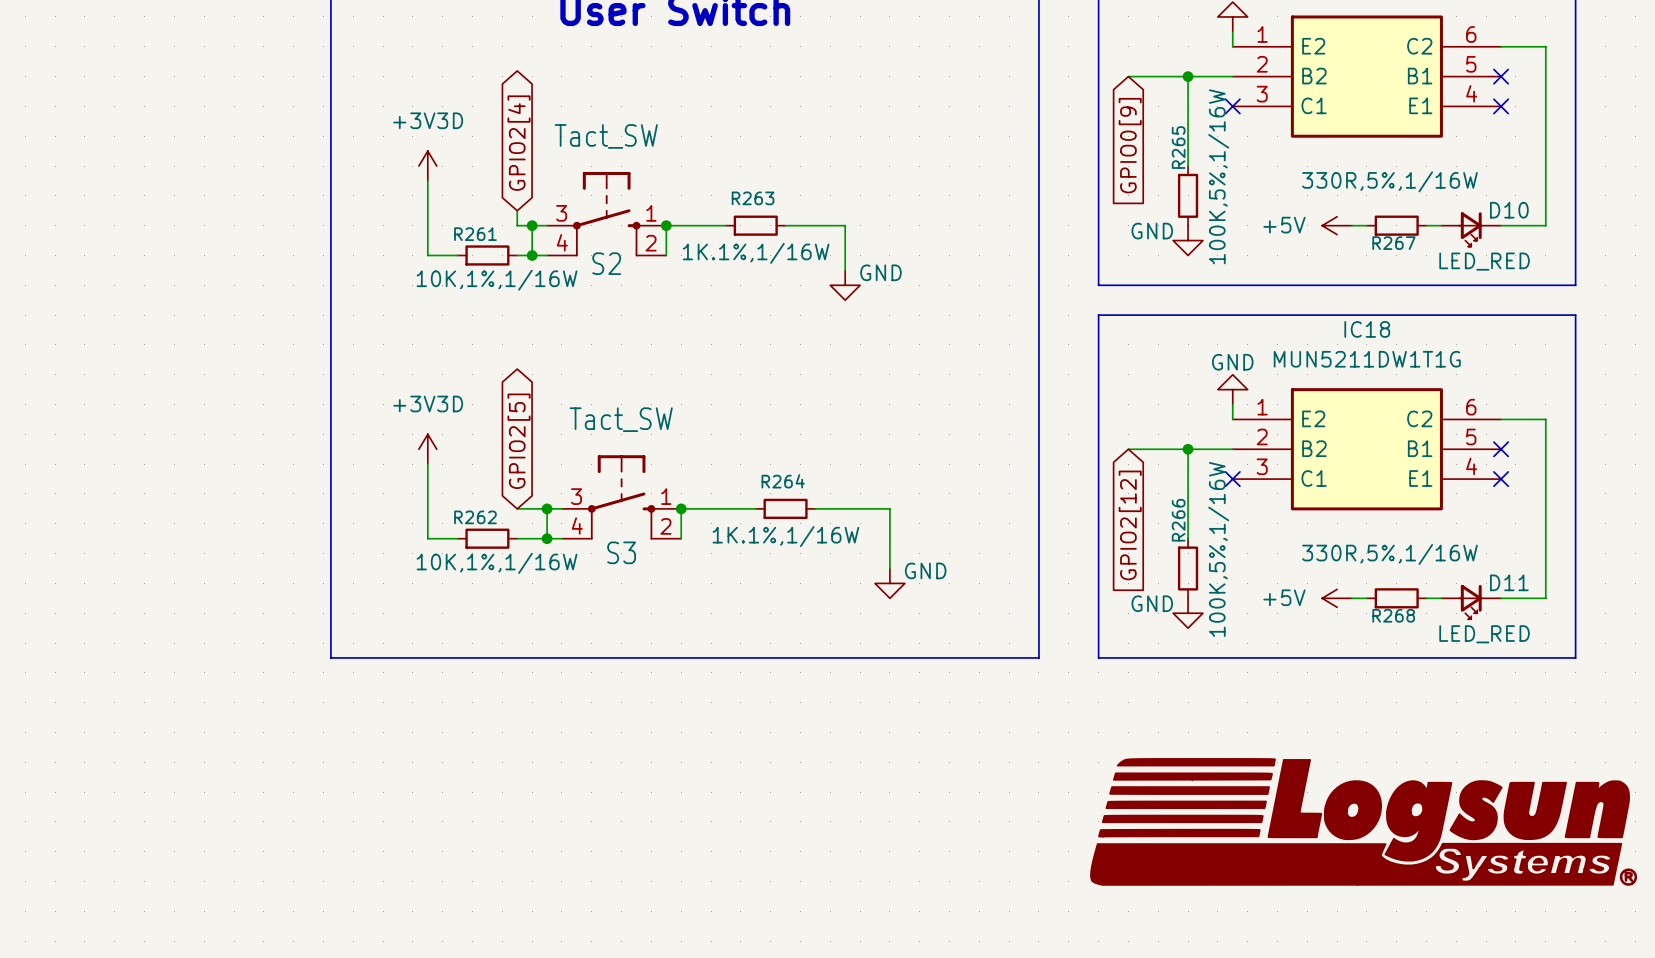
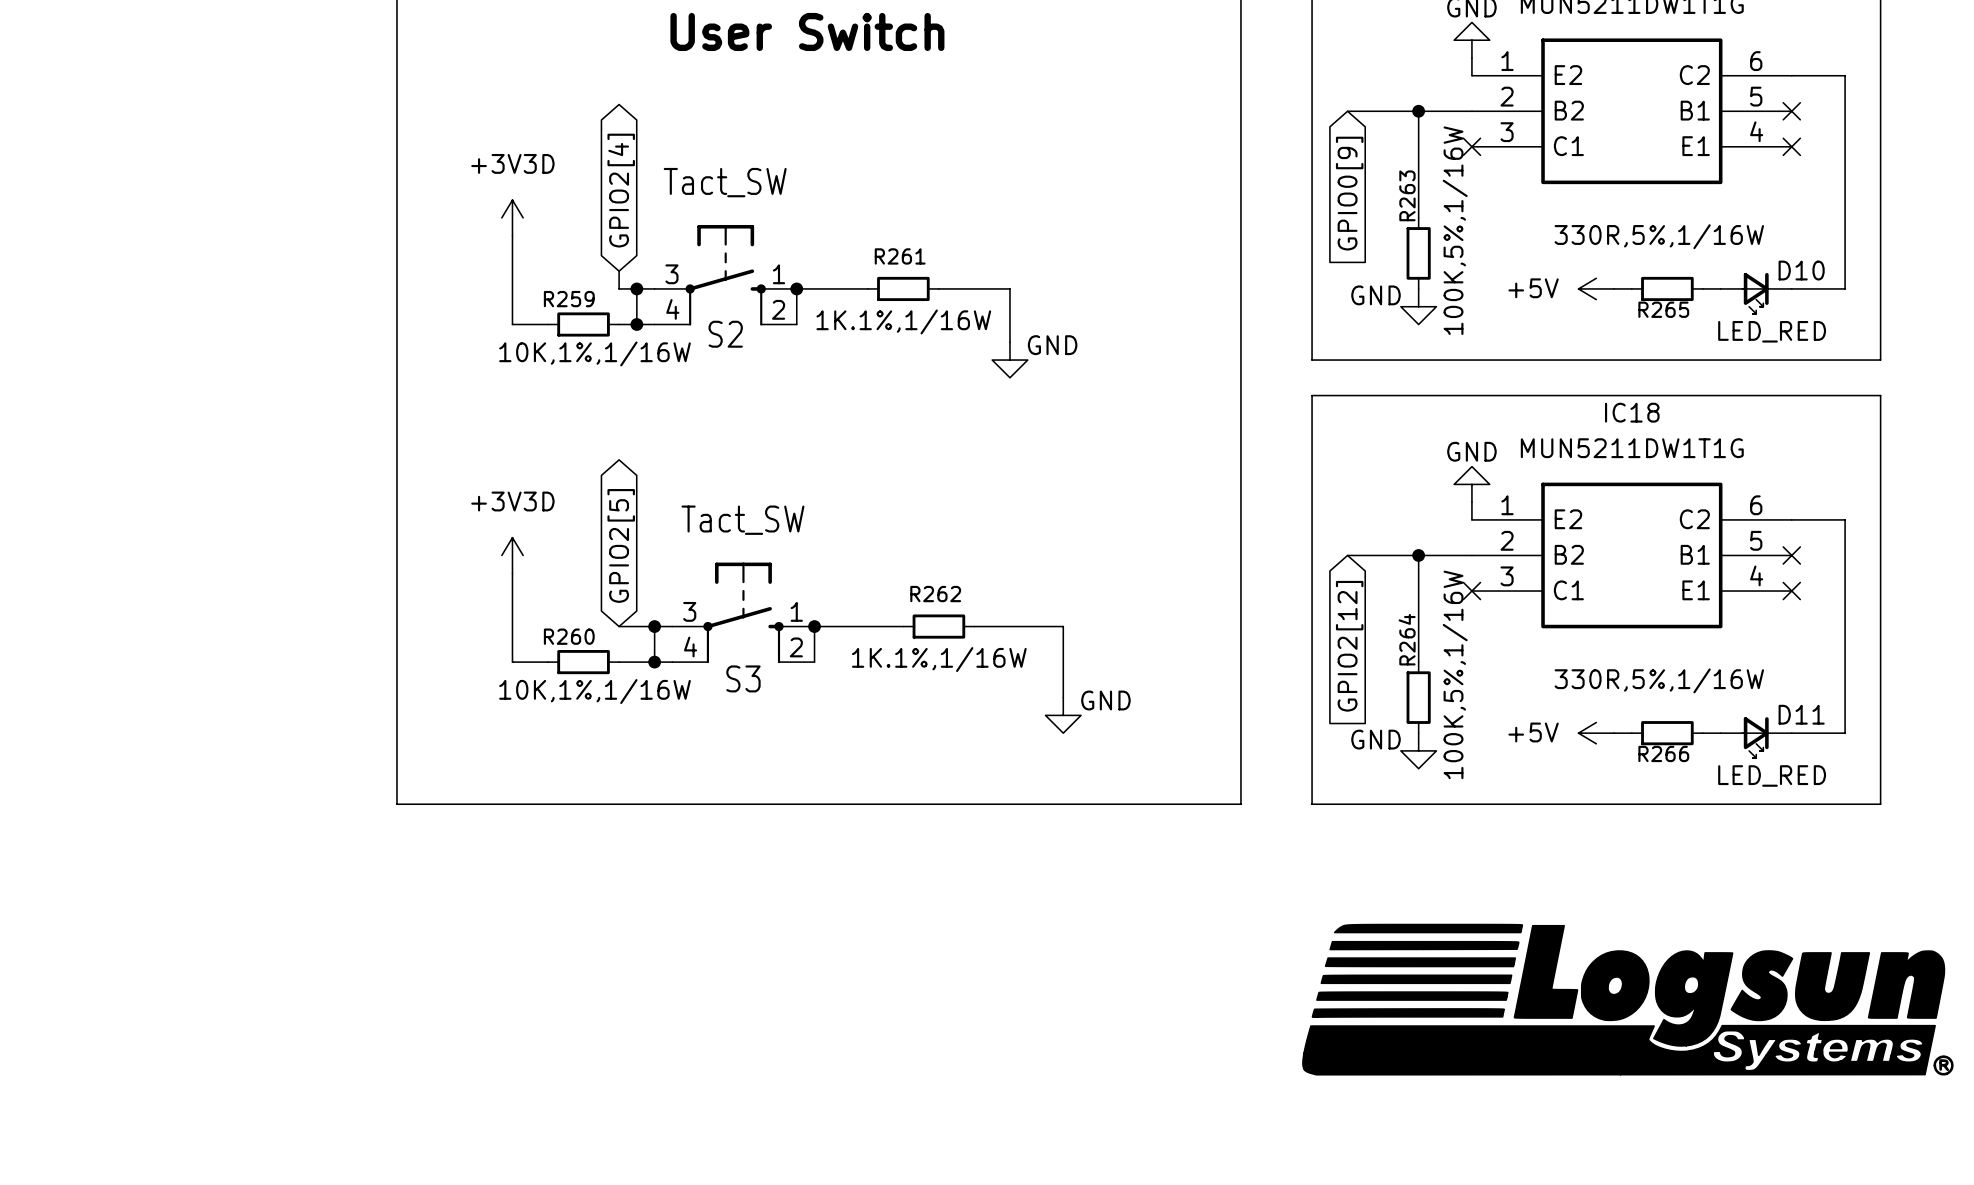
R265 name: R265 (1178, 147) -> R263 (1407, 195)
R263 name: R263 (753, 198) -> R261 (900, 256)
R261 name: R261 (475, 234) -> R259 (569, 299)
R267 name: R267 (1393, 243) -> R265 (1663, 309)
R264 name: R264 (783, 481) -> R262 (935, 594)
R262 name: R262 (475, 517) -> R260 (569, 636)
R266 name: R266 (1178, 520) -> R264 (1407, 639)
R268 name: R268 (1393, 615) -> R266 (1663, 753)

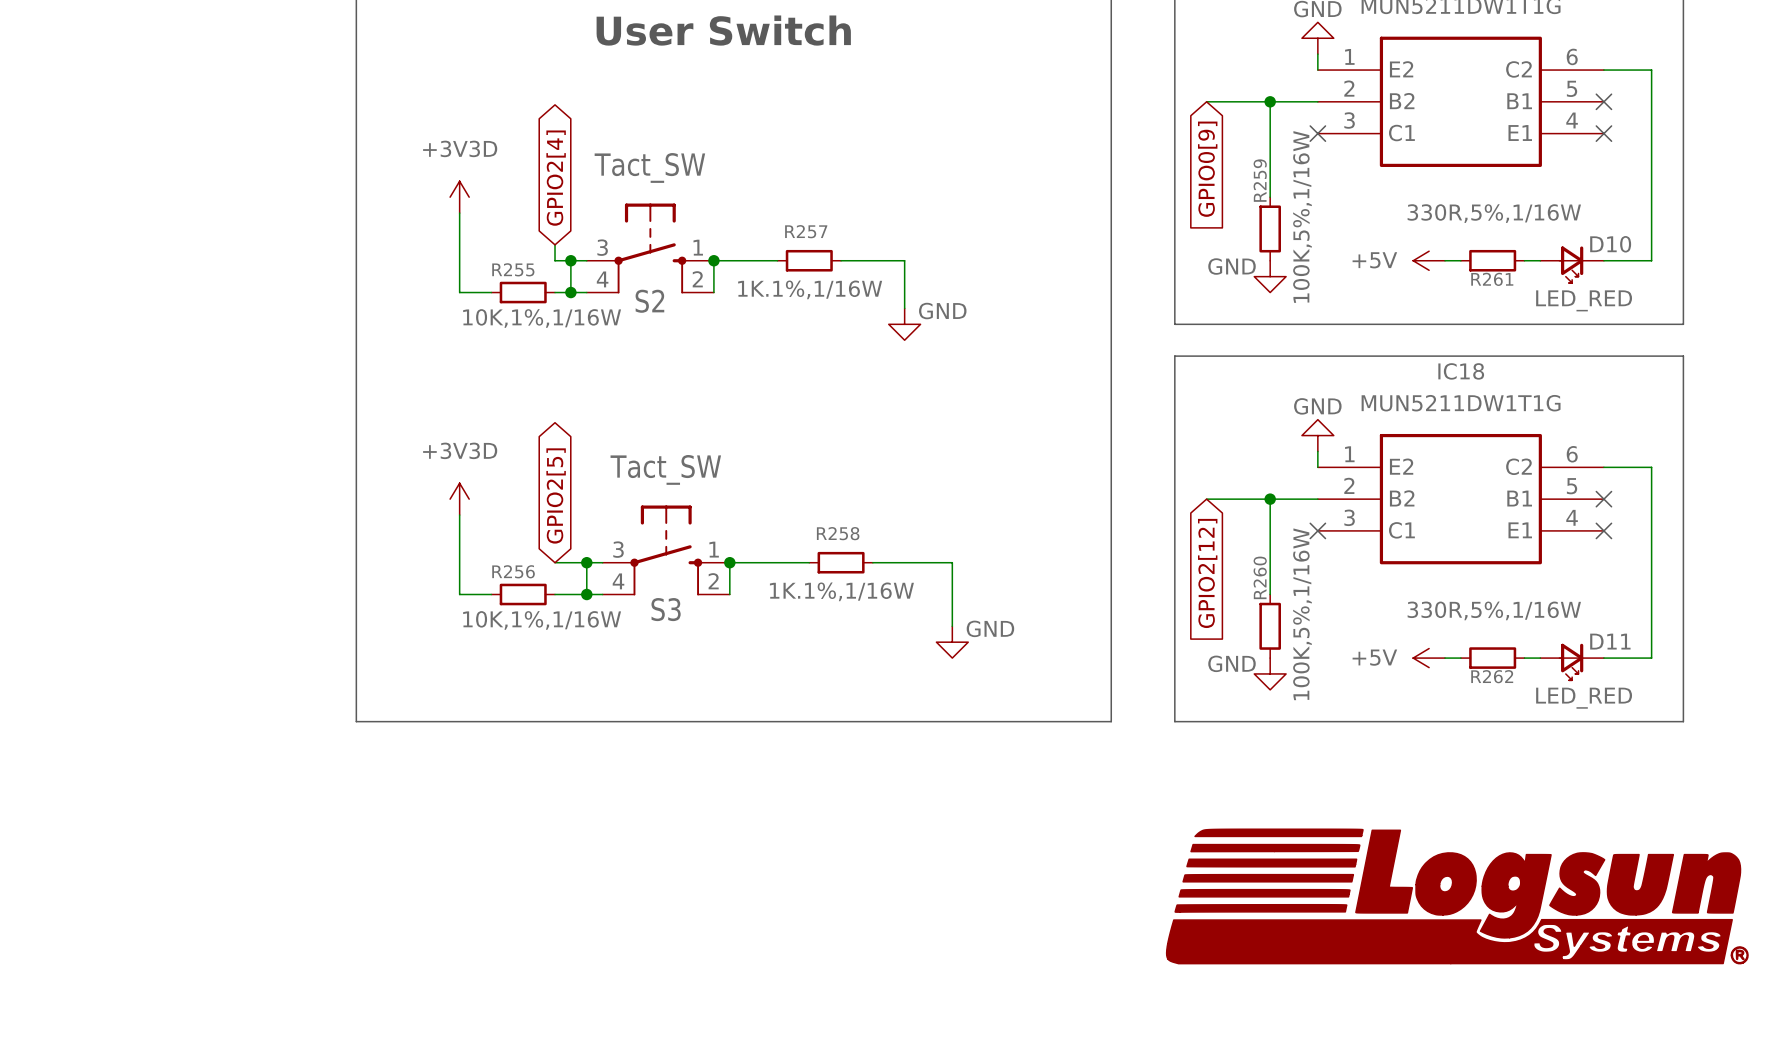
R263 name: R263 (1407, 195) -> R259 (1260, 180)
R261 name: R261 (900, 256) -> R257 (806, 231)
R259 name: R259 (569, 299) -> R255 (513, 269)
R265 name: R265 (1663, 309) -> R261 (1492, 279)
R262 name: R262 (935, 594) -> R258 (838, 533)
R260 name: R260 (569, 636) -> R256 (513, 571)
R264 name: R264 (1407, 639) -> R260 (1260, 577)
R266 name: R266 (1663, 753) -> R262 (1492, 676)

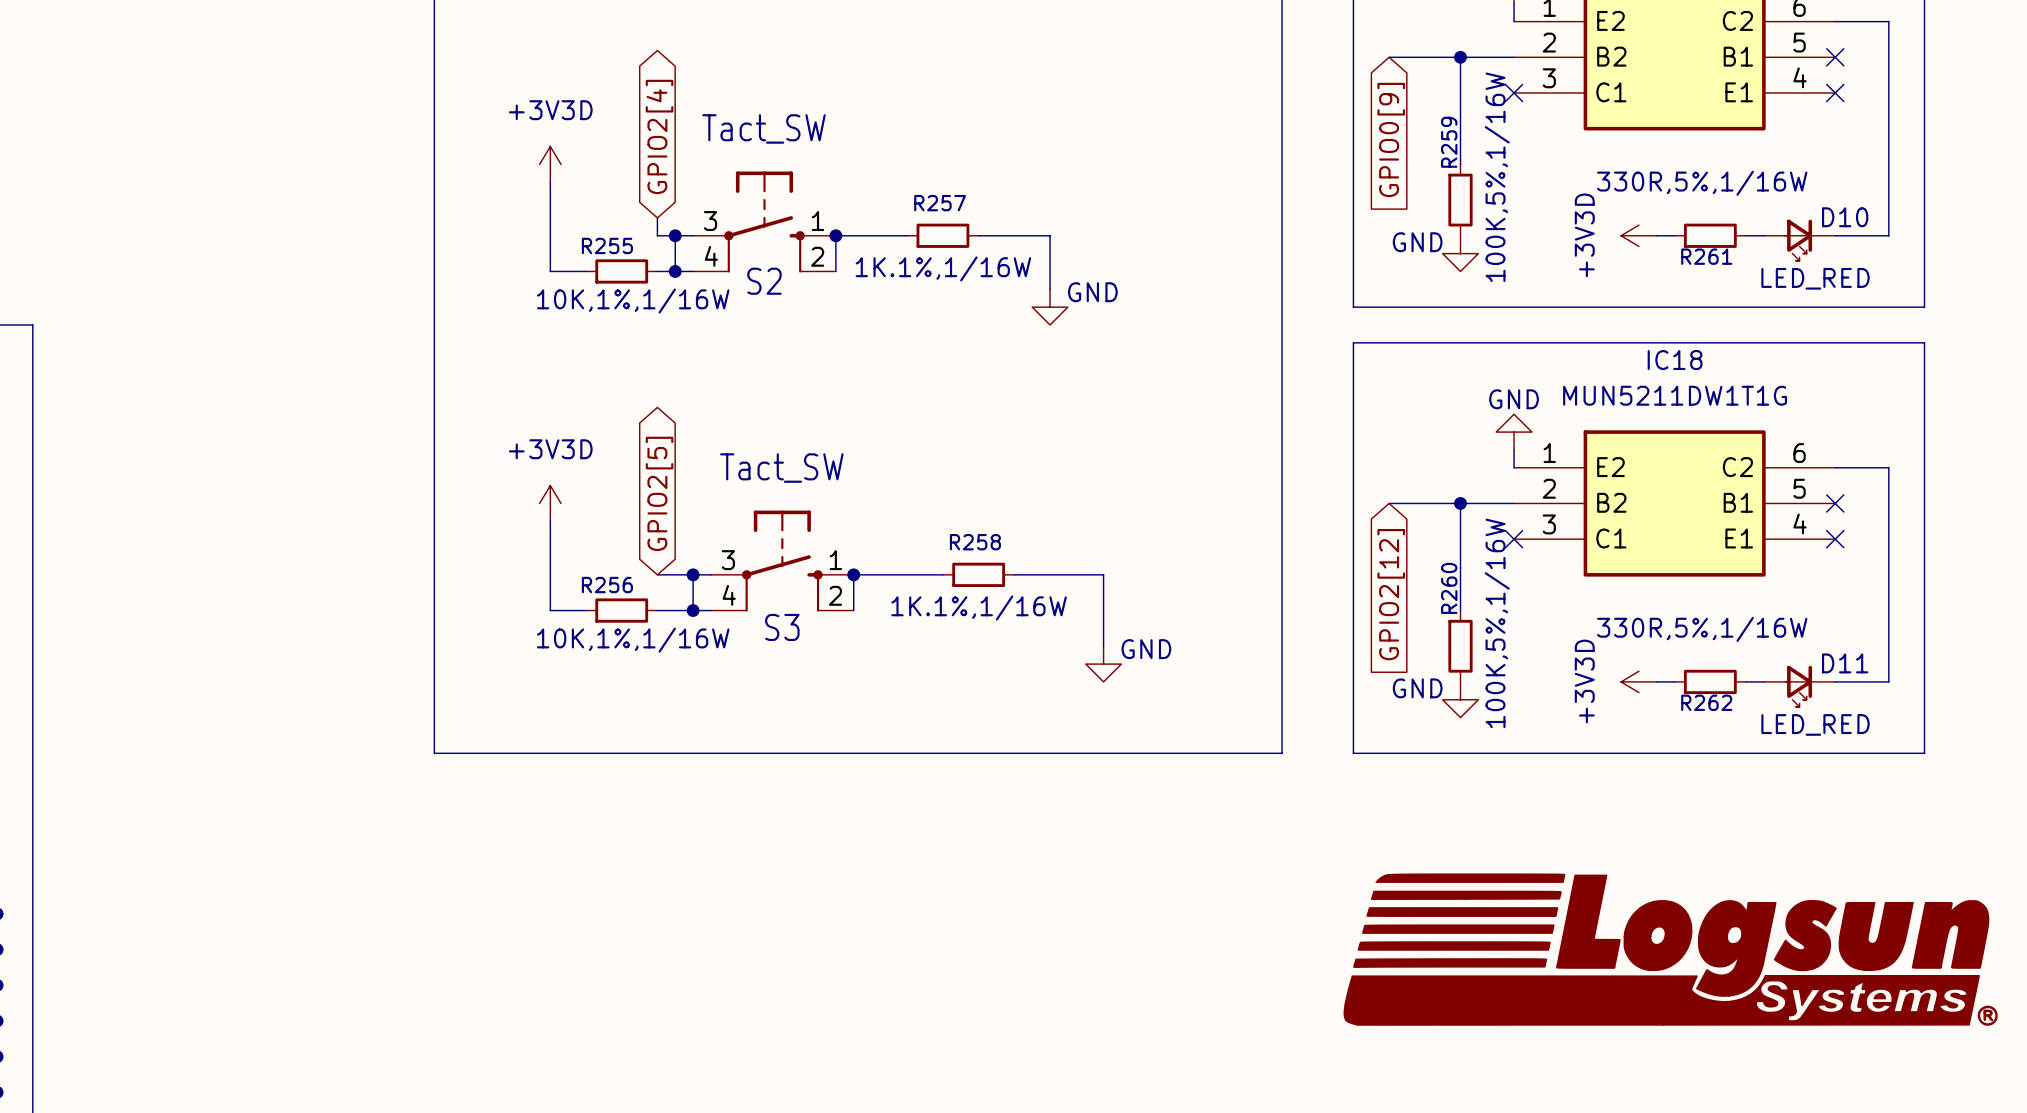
power symbol: +5V (1429, 260) -> +3V3D (1638, 235)
power symbol: +5V (1429, 658) -> +3V3D (1638, 681)

